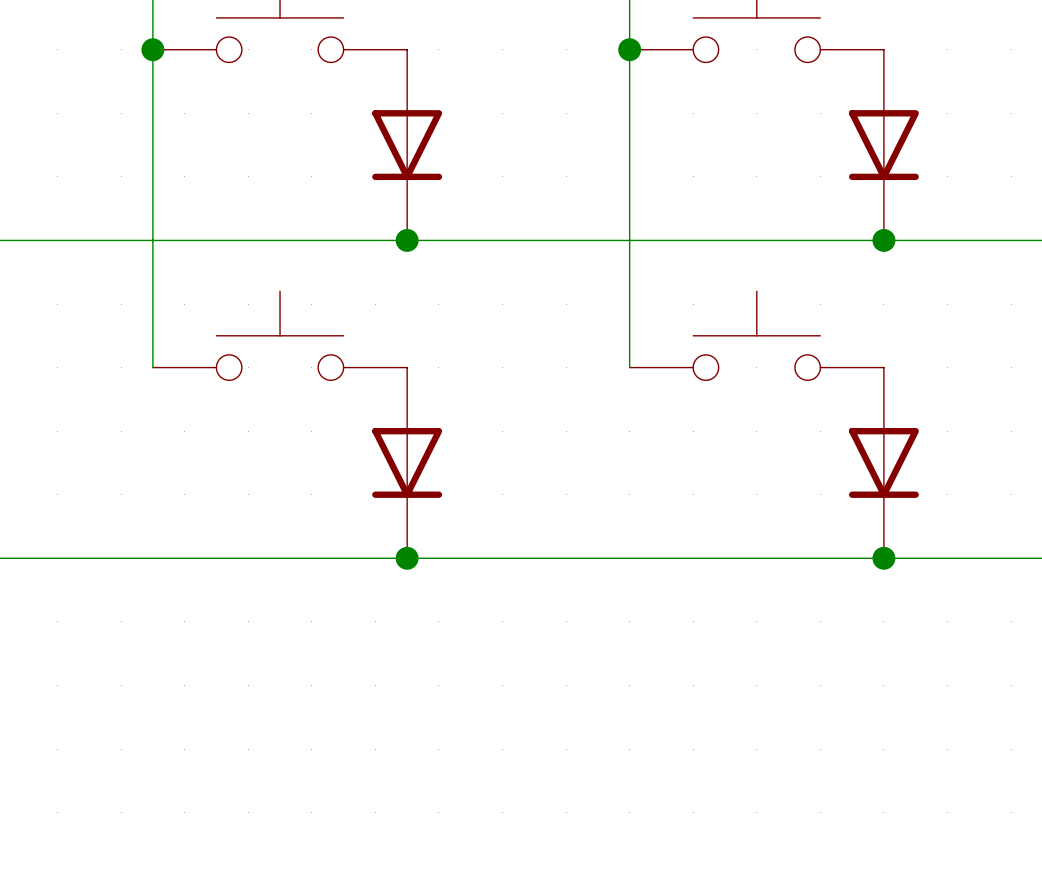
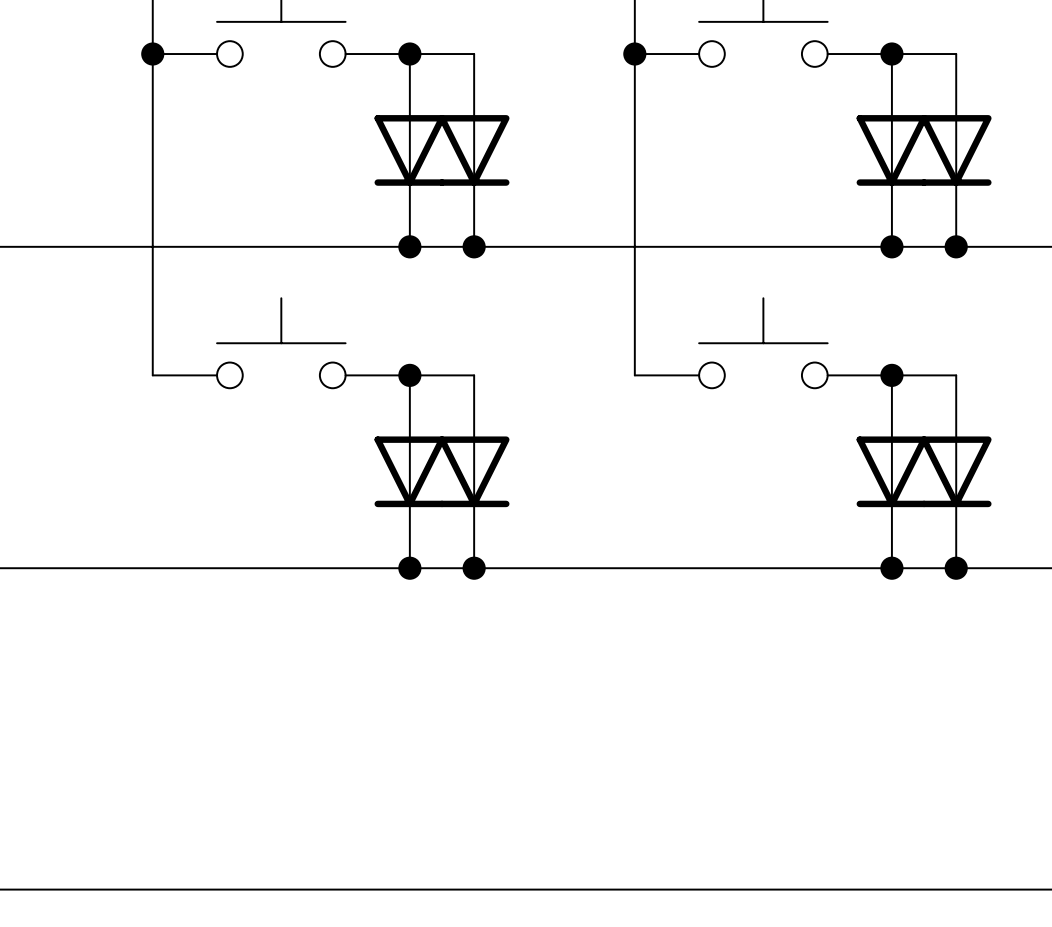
wire: none -> (409, 54) (474, 54)
junction: none -> (409, 54)
wire: none -> (891, 54) (956, 54)
junction: none -> (891, 54)
part: none -> (474, 150)
part: none -> (956, 150)
junction: none -> (474, 246)
junction: none -> (956, 246)
wire: none -> (409, 375) (474, 375)
junction: none -> (409, 375)
wire: none -> (891, 375) (956, 375)
junction: none -> (891, 375)
part: none -> (474, 471)
part: none -> (956, 471)
junction: none -> (474, 568)
junction: none -> (956, 568)

